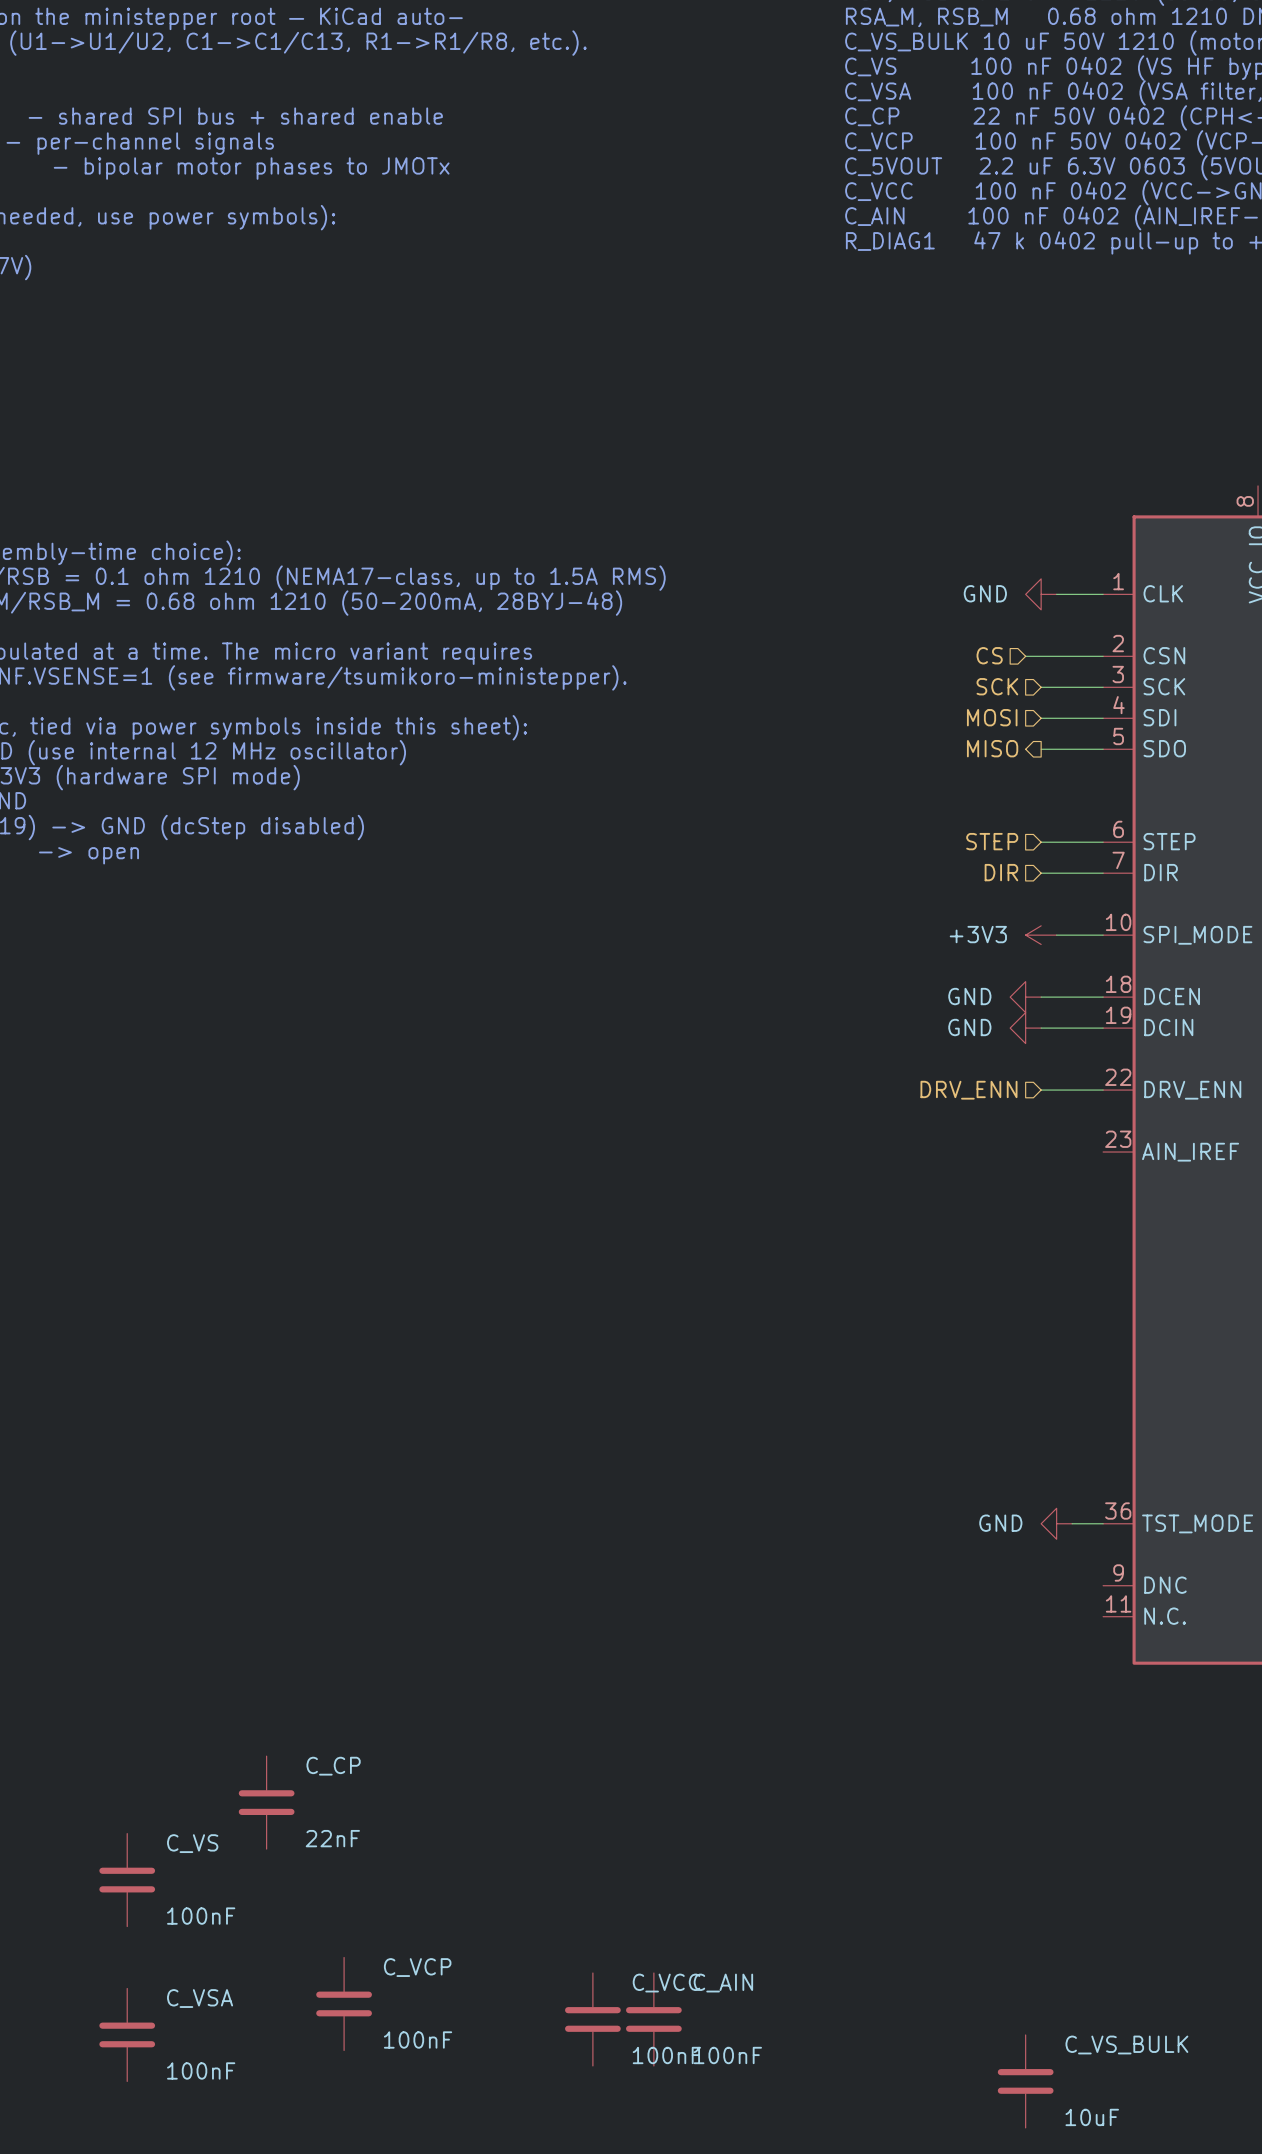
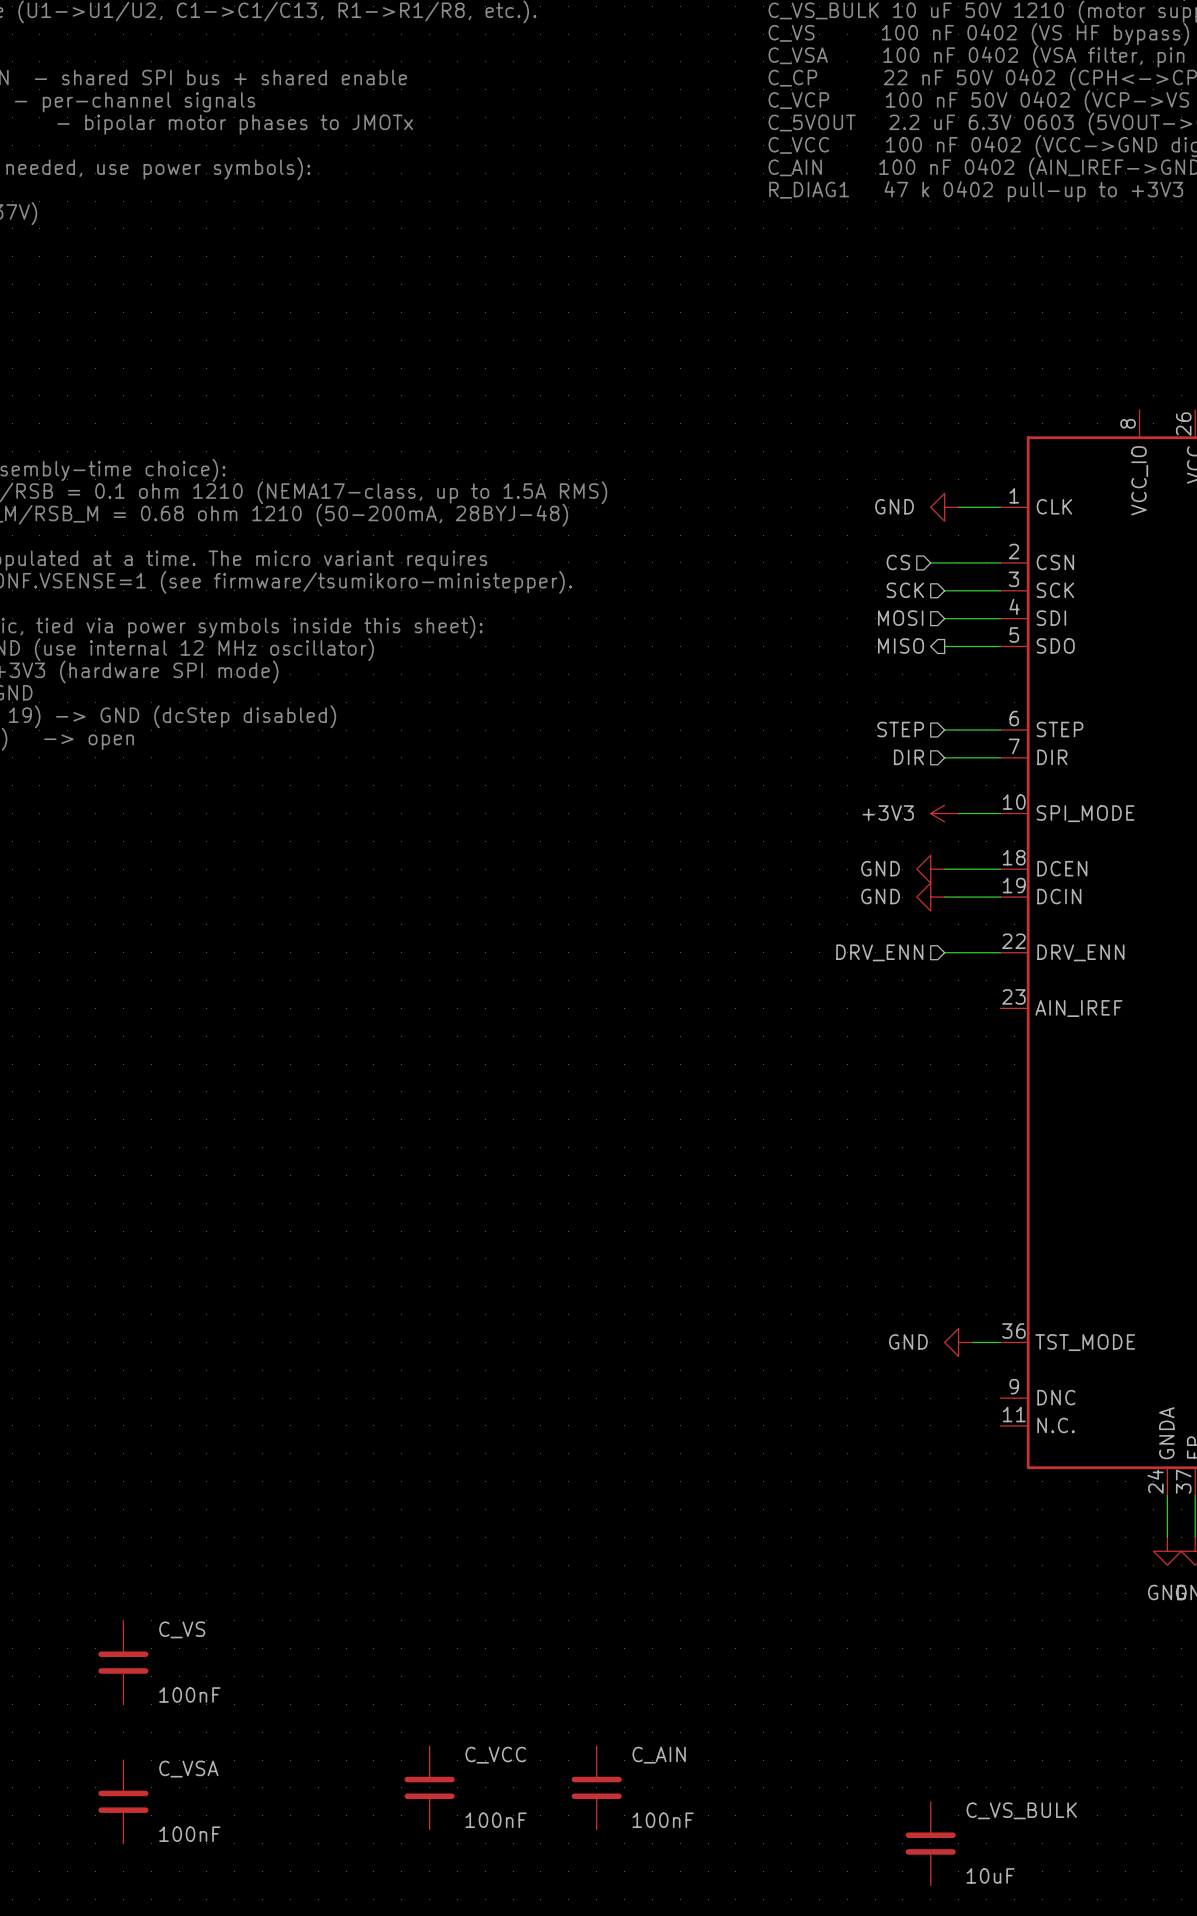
C_CP: 22nF (266, 1802) -> none
C_VCP: 100nF (344, 2003) -> none
C_VCC position: (592, 2019) -> (429, 1787)

